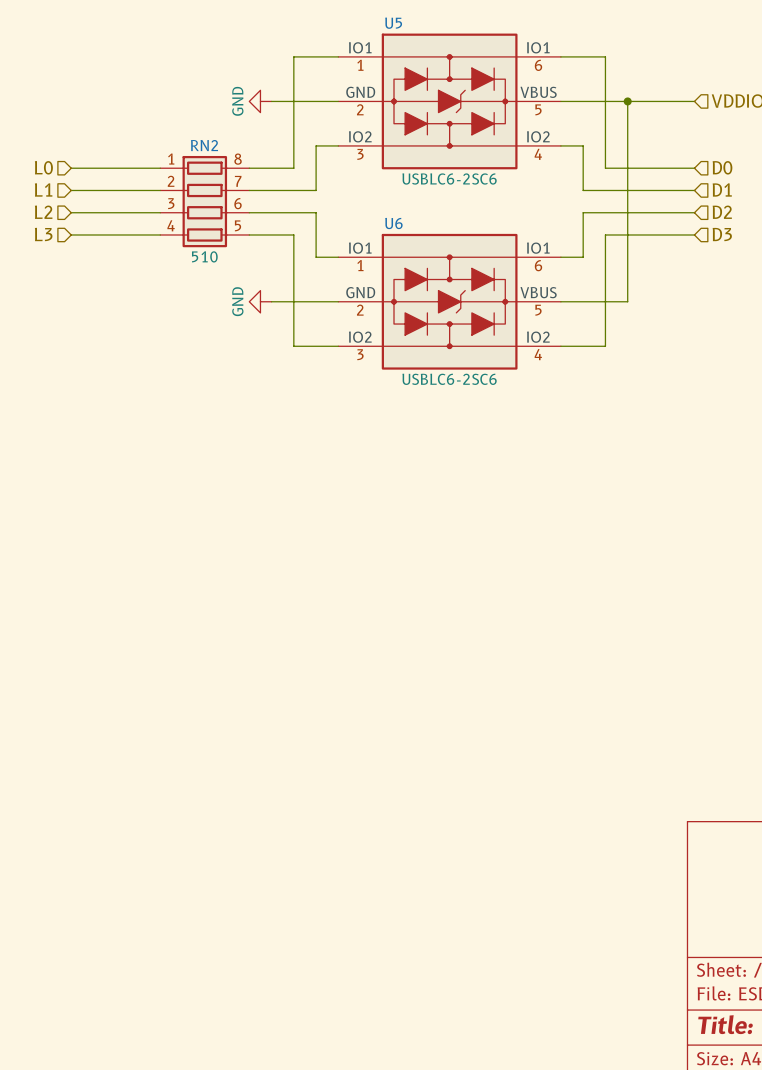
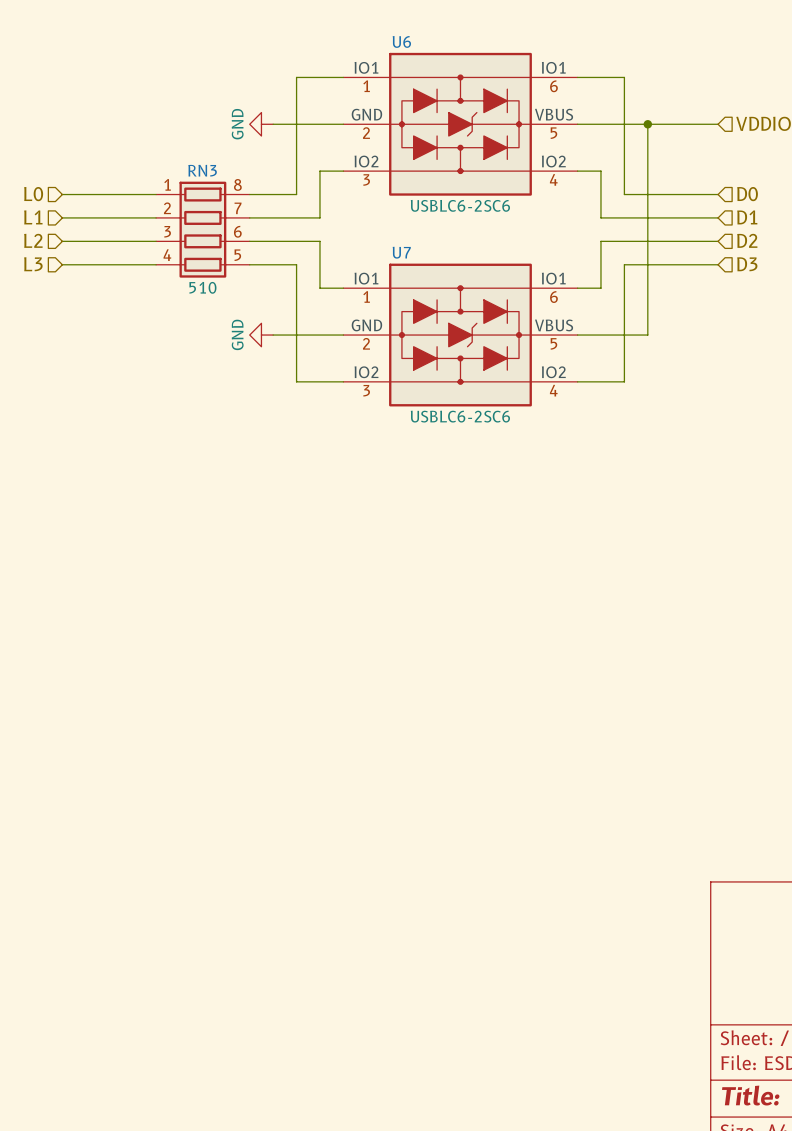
U5 name: U5 (393, 23) -> U6 (401, 41)
RN2 name: RN2 (204, 145) -> RN3 (202, 170)
U6 name: U6 (393, 223) -> U7 (401, 252)

